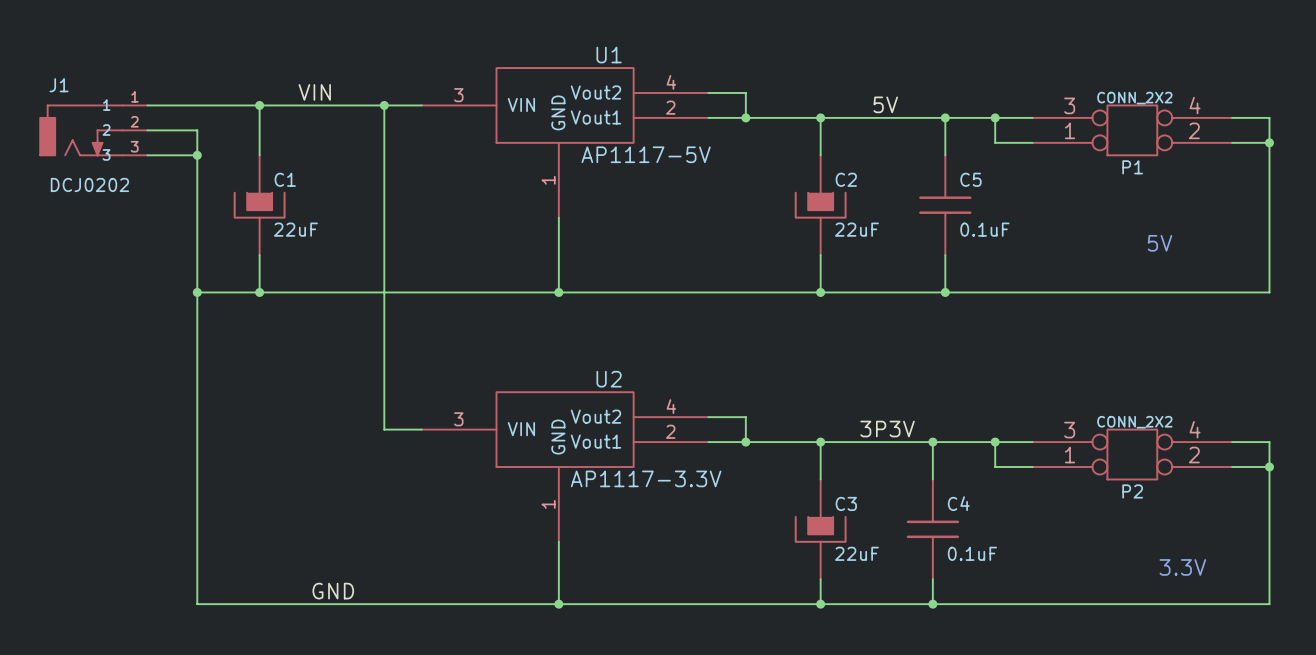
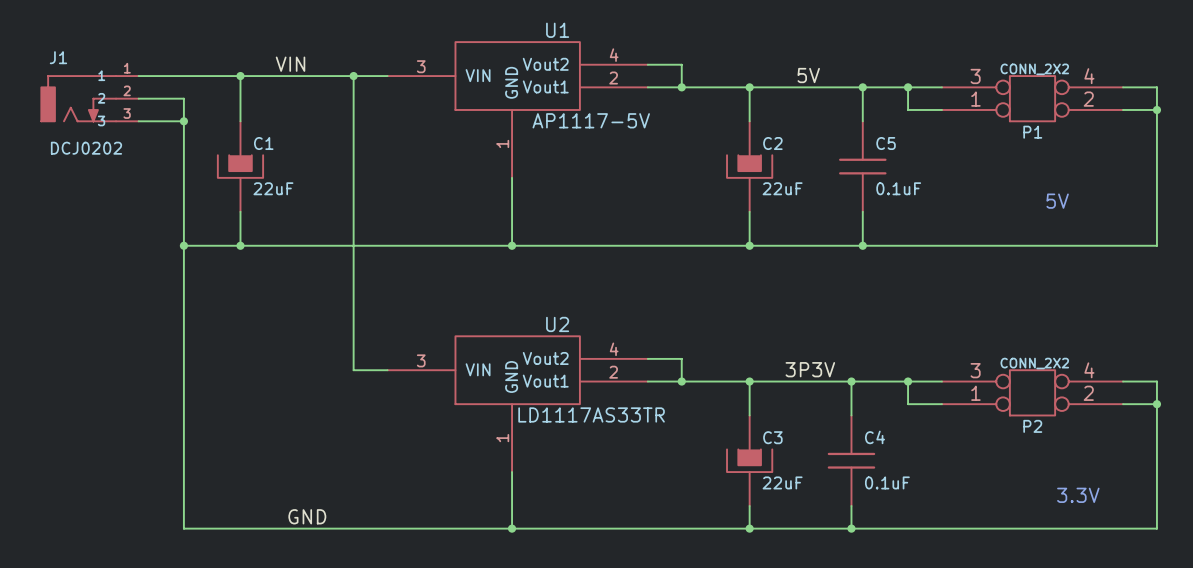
U2 value: AP1117-3.3V (646, 478) -> LD1117AS33TR (591, 414)

